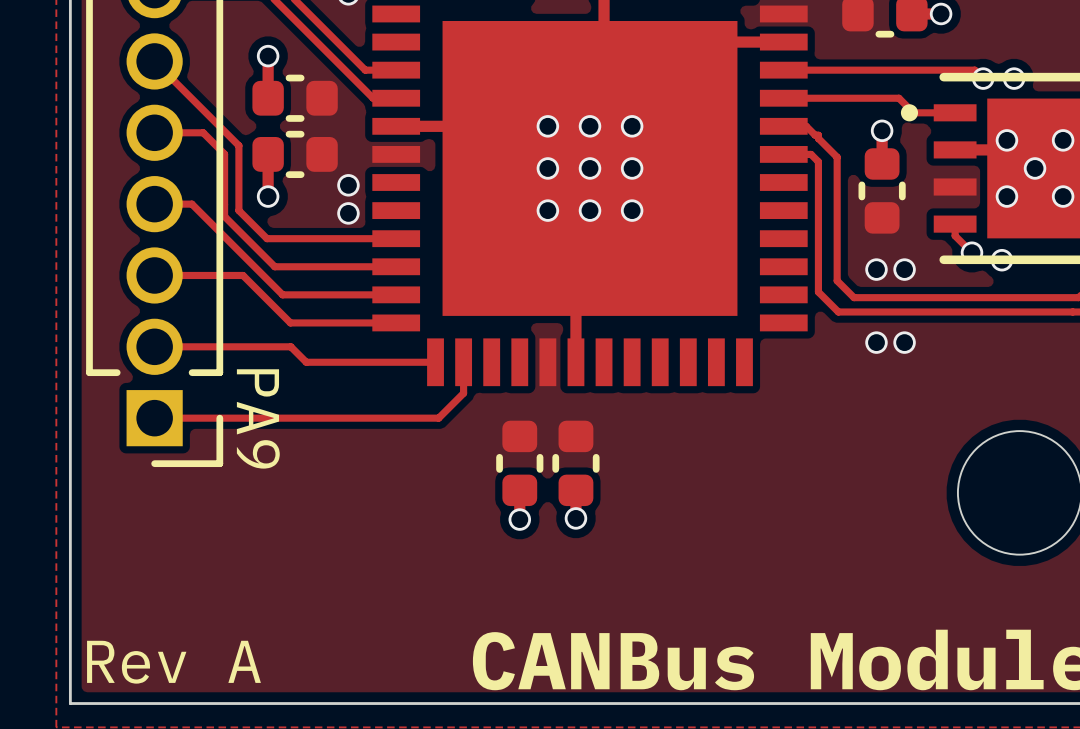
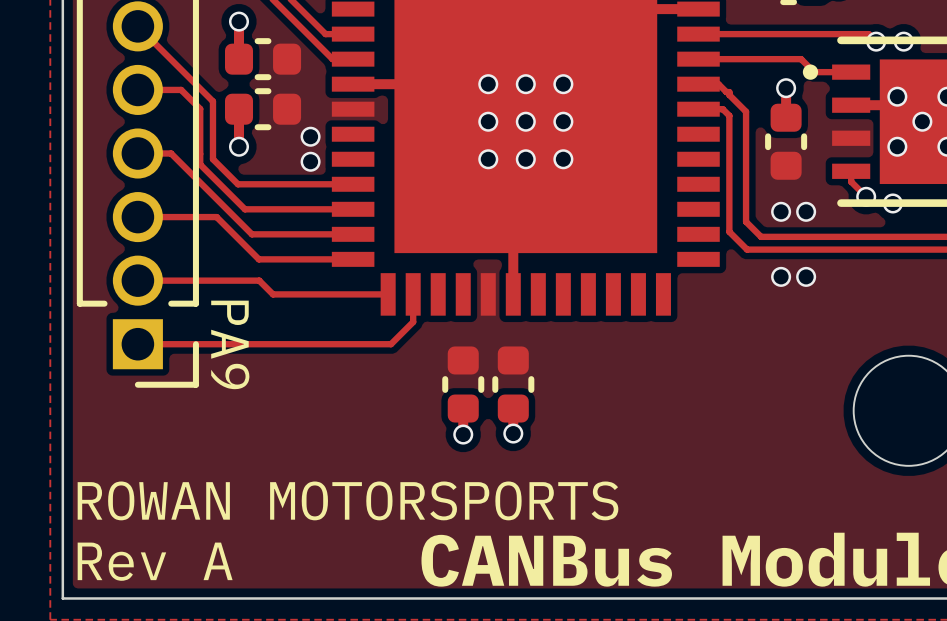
text: none -> ROWAN MOTORSPORTS (347, 500)

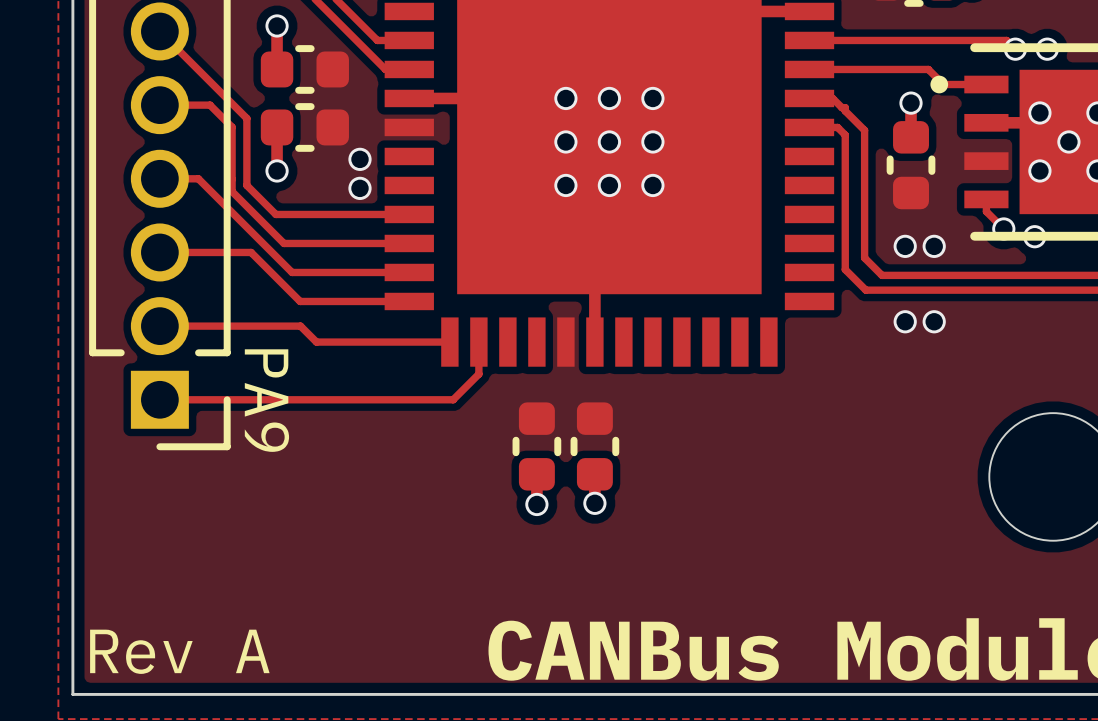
text: ROWAN MOTORSPORTS (347, 500) -> none

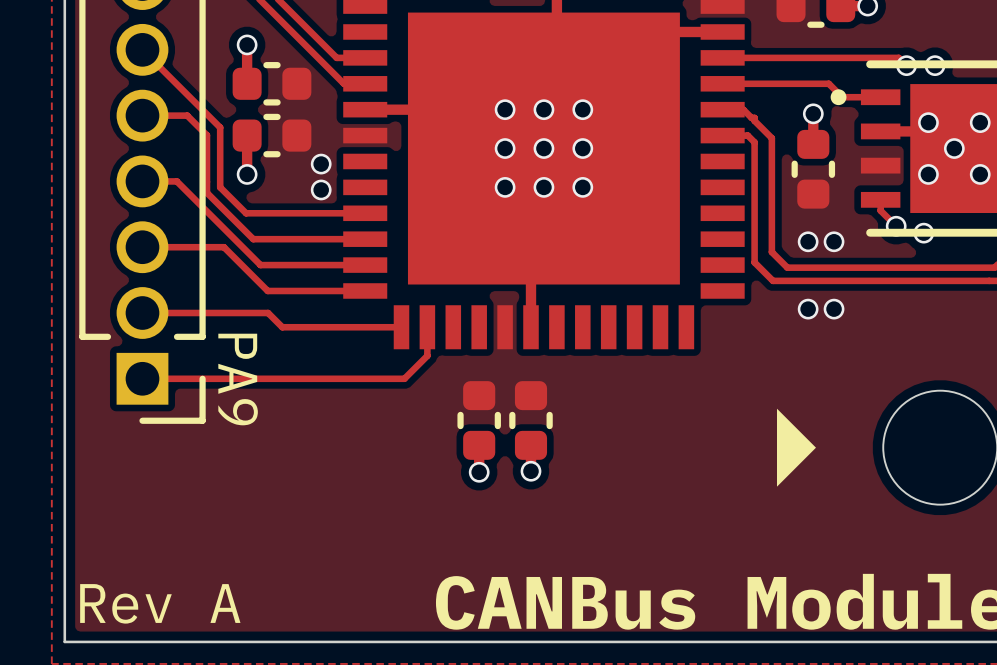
drawing: none -> [777, 408, 816, 487]

